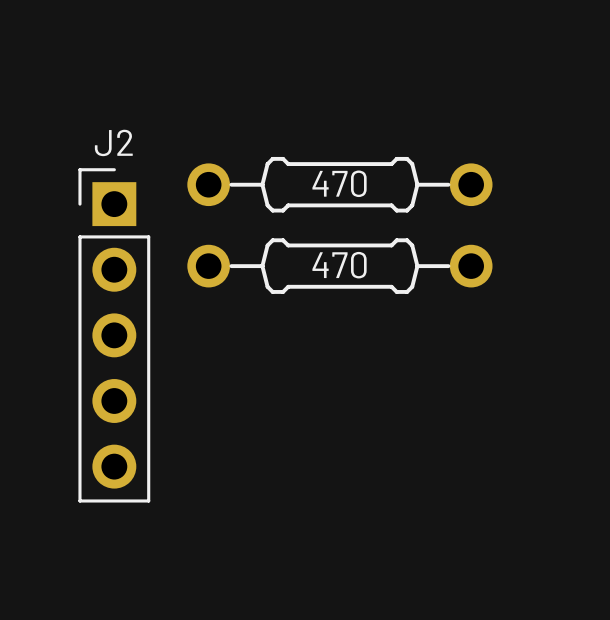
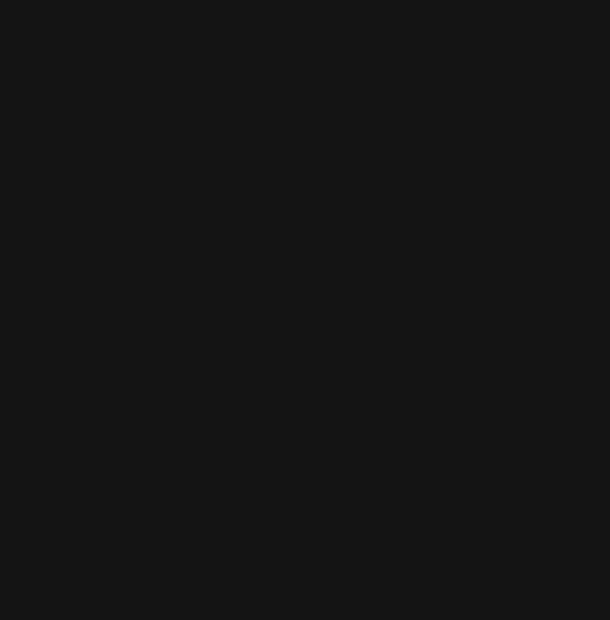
part: 470 (339, 184) -> none
part: 470 (339, 266) -> none
J2: (114, 335) -> none

